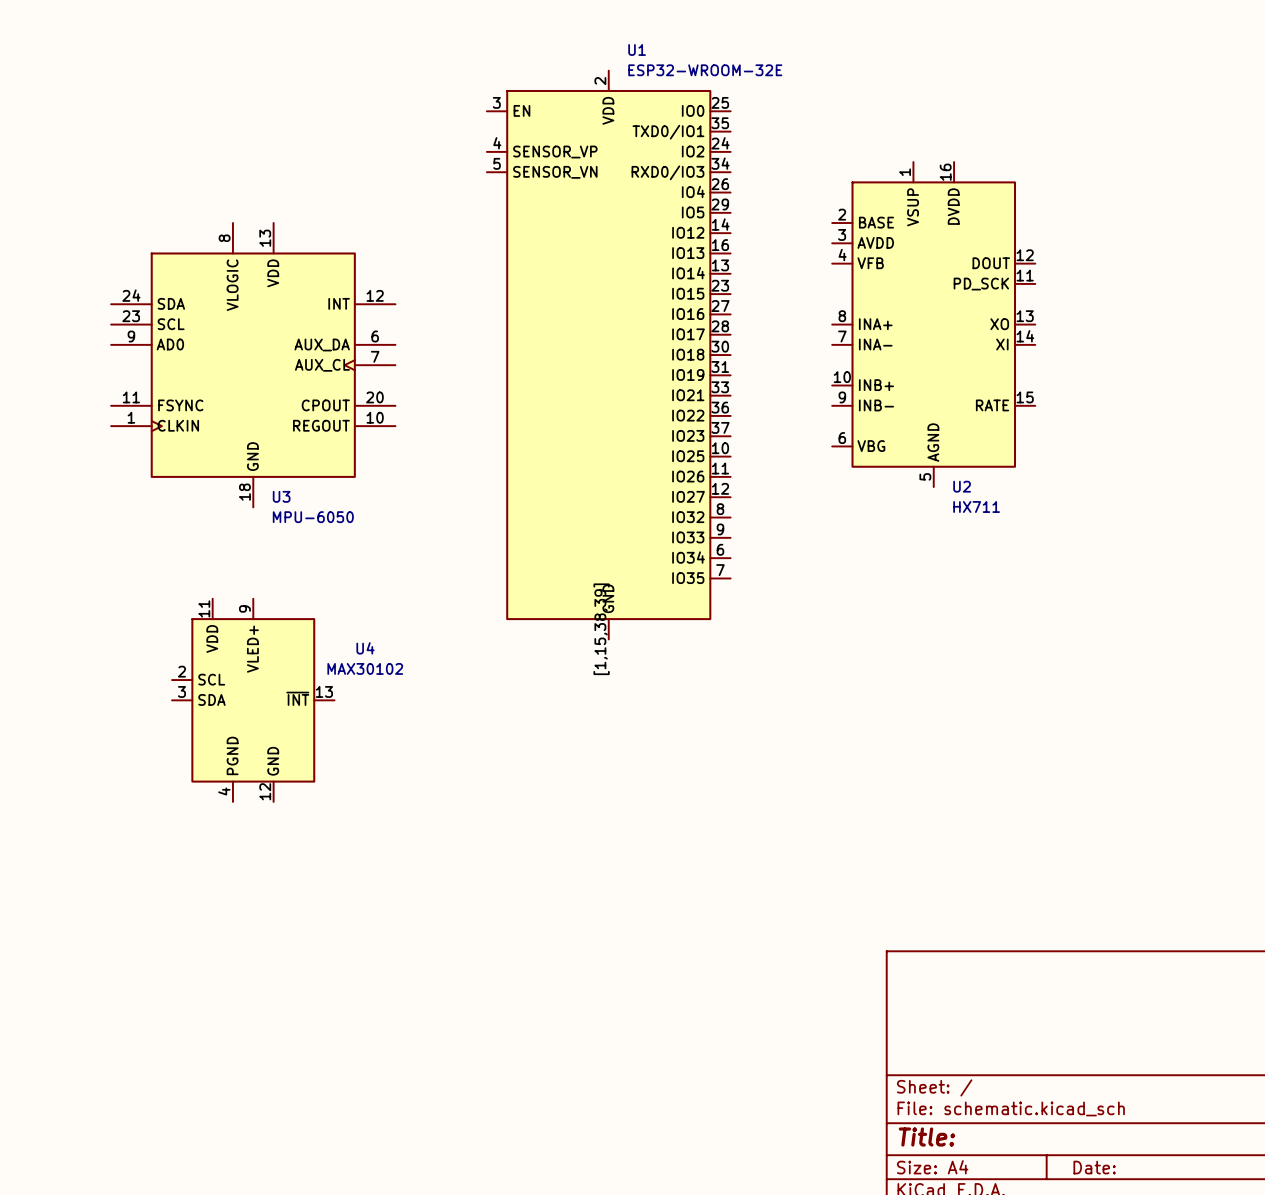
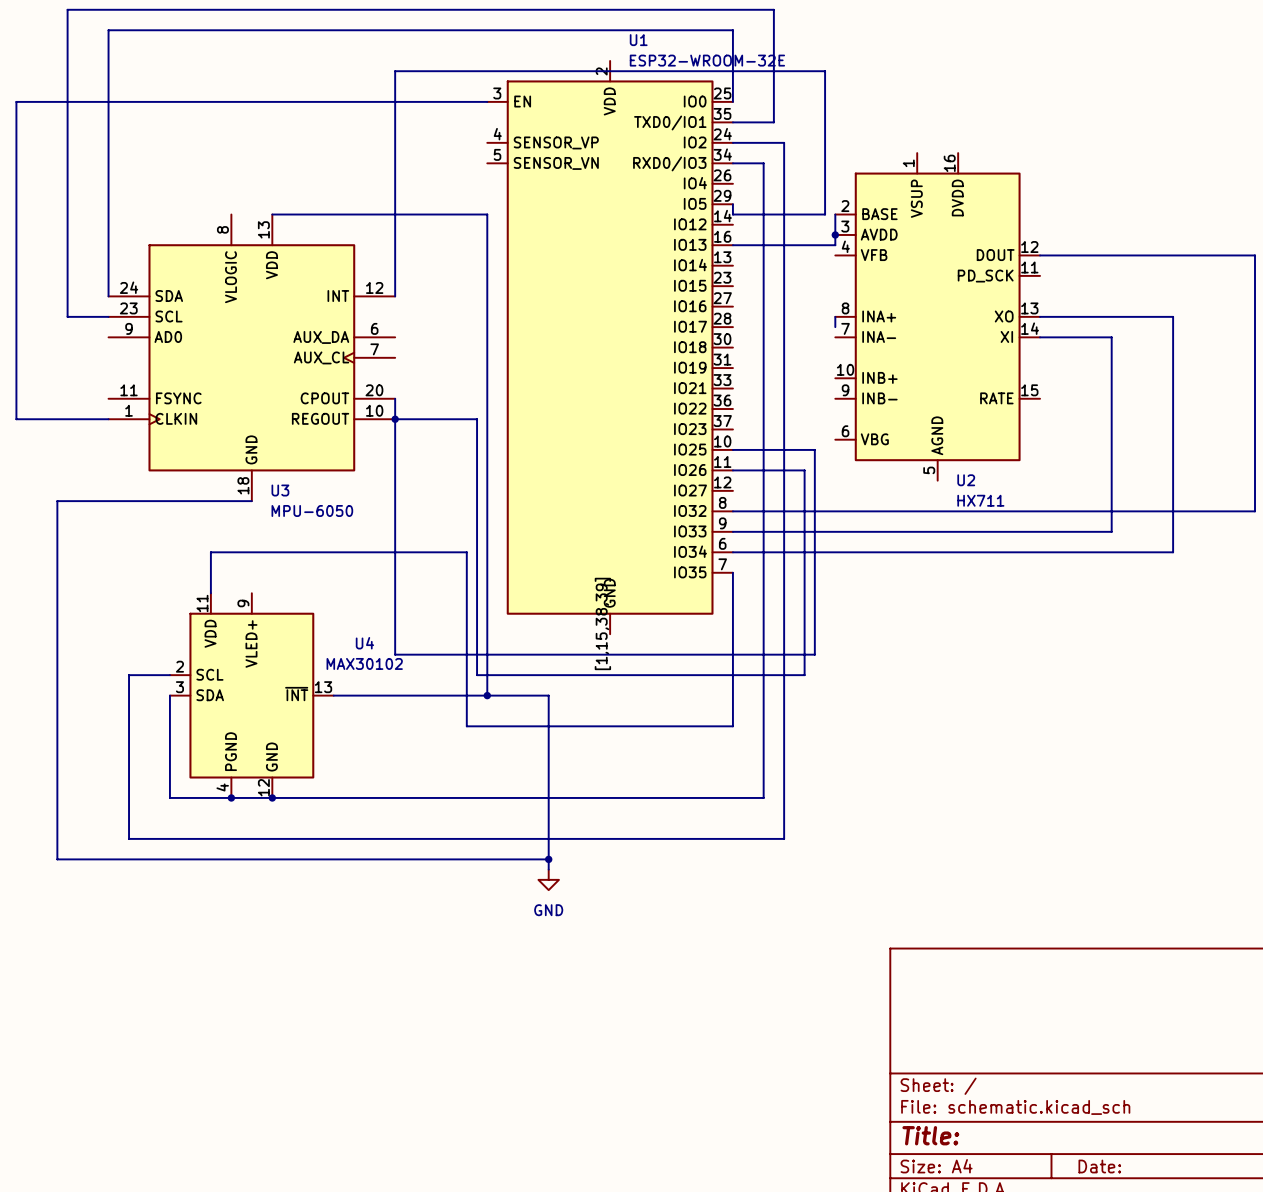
wire: none -> (487, 101) (16, 101) (16, 419) (108, 419)
wire: none -> (732, 101) (732, 30) (108, 30) (108, 296)
wire: none -> (732, 122) (773, 122) (773, 9) (67, 9) (67, 316) (108, 316)
wire: none -> (732, 142) (784, 142) (784, 838) (129, 838) (129, 675) (169, 675)
wire: none -> (732, 163) (763, 163) (763, 797) (169, 797) (169, 695)
wire: none -> (732, 204) (732, 214) (825, 214) (825, 71) (395, 71) (395, 296)
wire: none -> (272, 214) (487, 214) (487, 695)
wire: none -> (835, 214) (835, 245) (732, 245)
junction: none -> (835, 234)
wire: none -> (1040, 255) (1255, 255) (1255, 511) (732, 511)
wire: none -> (835, 316) (835, 327)
wire: none -> (1040, 316) (1173, 316) (1173, 552) (732, 552)
wire: none -> (1040, 337) (1111, 337) (1111, 531) (732, 531)
wire: none -> (395, 398) (395, 654) (814, 654) (814, 449) (732, 449)
wire: none -> (395, 419) (477, 419) (477, 675) (804, 675) (804, 470) (732, 470)
junction: none -> (395, 419)
wire: none -> (251, 501) (57, 501) (57, 859) (548, 859)
wire: none -> (732, 572) (732, 726) (466, 726) (466, 552) (210, 552) (210, 593)
wire: none -> (333, 695) (548, 695) (548, 869)
junction: none -> (487, 695)
junction: none -> (231, 797)
junction: none -> (272, 797)
junction: none -> (548, 859)
power symbol: none -> GND (548, 879)

